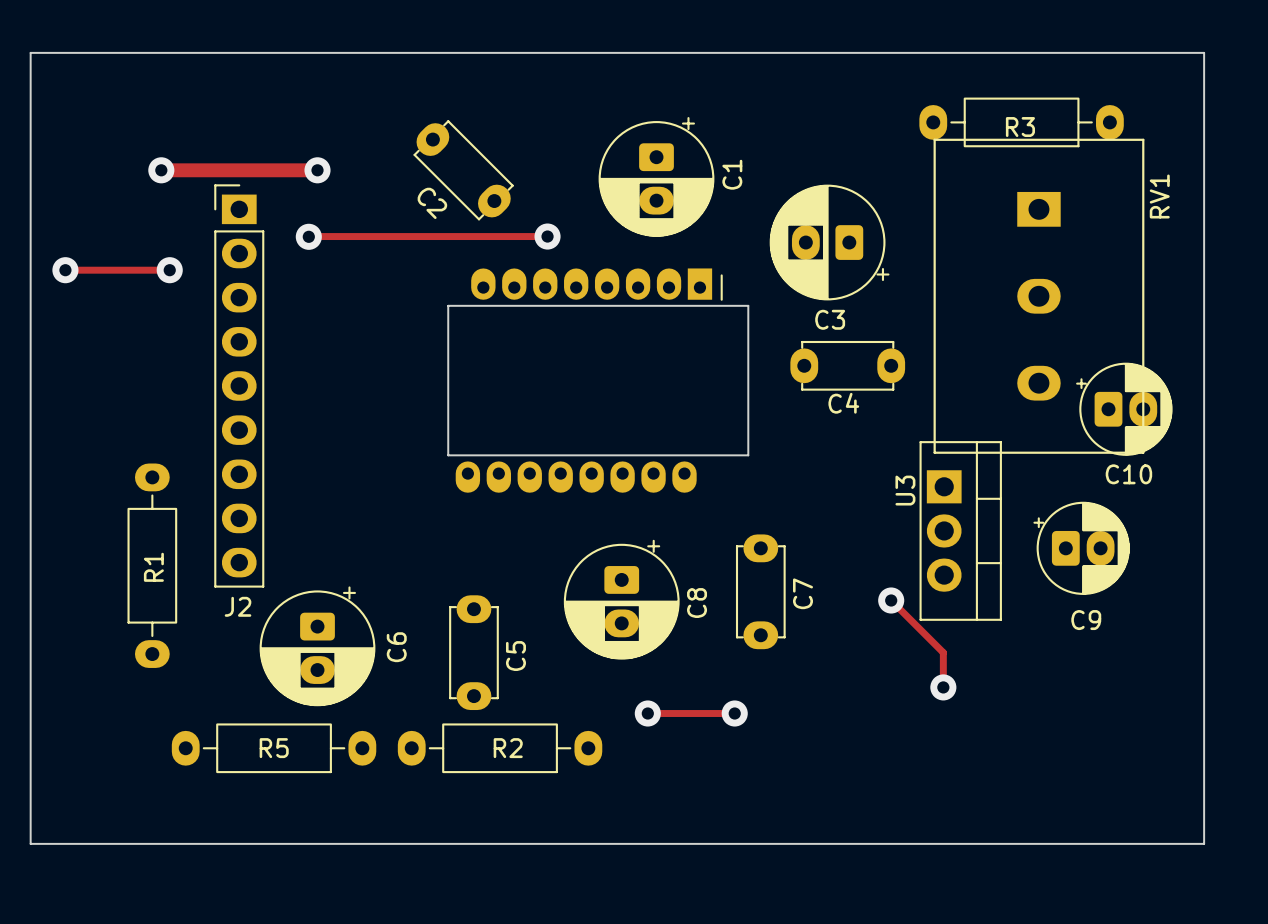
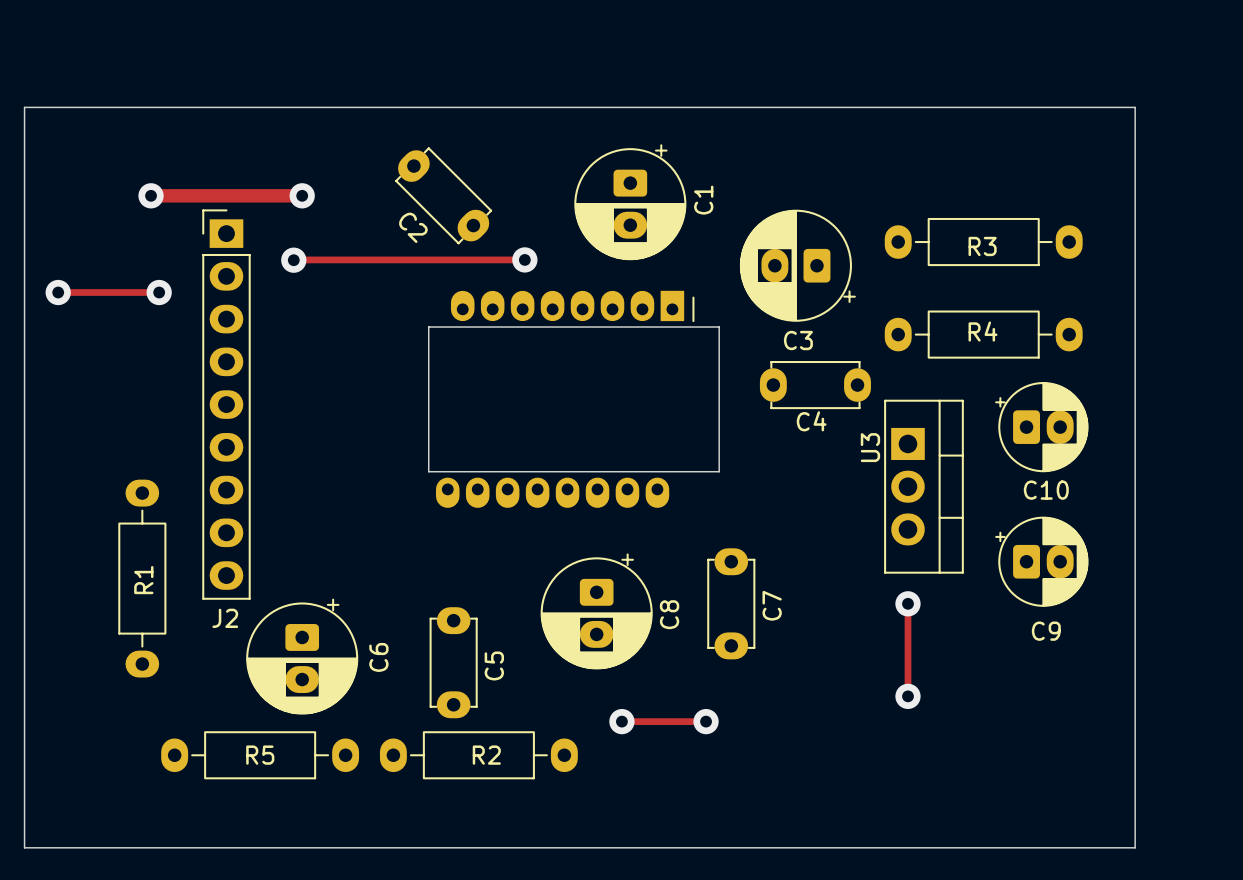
board edge: (30, 78) (30, 52) (1204, 52) (1204, 843) (1178, 843) -> (24, 107) (1135, 107) (1135, 847)
R3 position: (1021, 122) -> (983, 242)
RV1: (1038, 296) -> none
R4: none -> (983, 334)
C10 position: (1124, 409) -> (1041, 427)
U3 position: (960, 530) -> (923, 486)
track: (891, 600) (943, 652) -> (907, 603) (907, 662)
via position: (891, 600) -> (907, 603)

